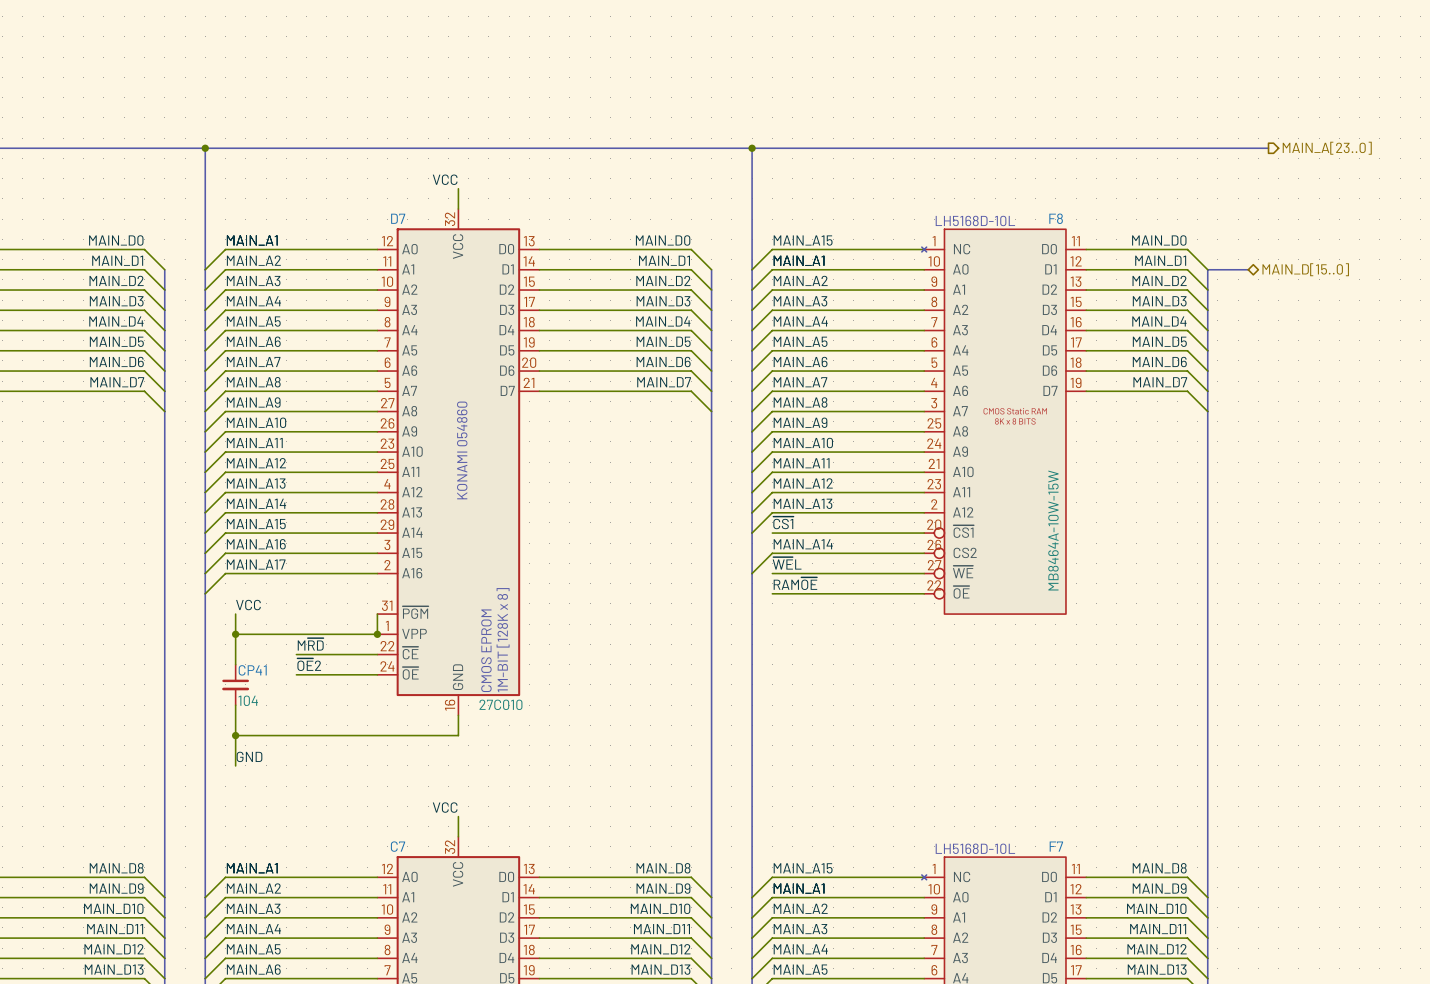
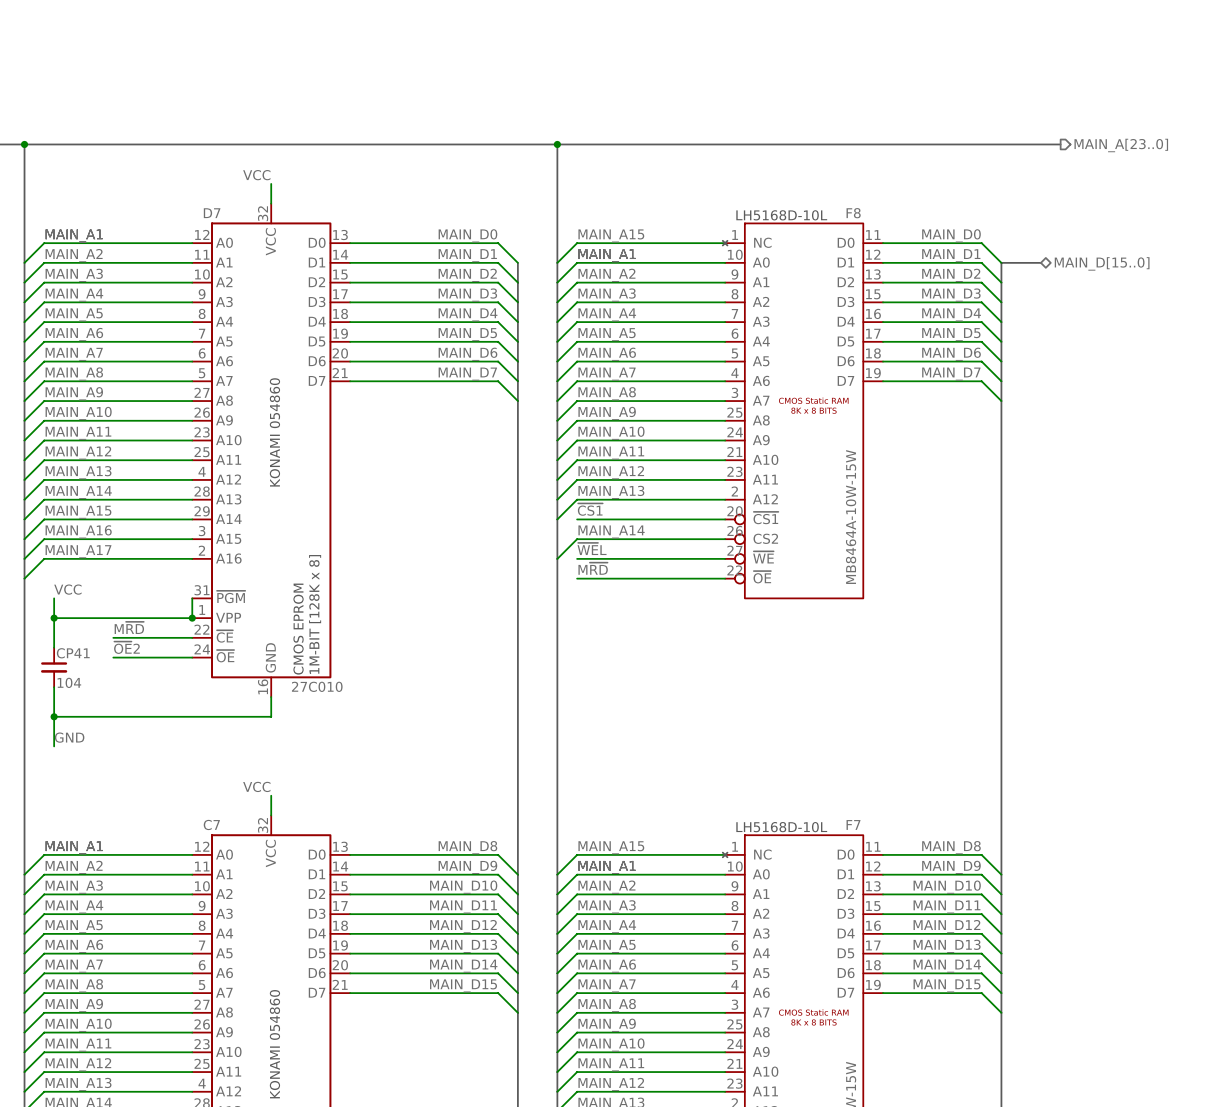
label: RAM~{OE} (795, 583) -> M~{RD} (593, 568)

